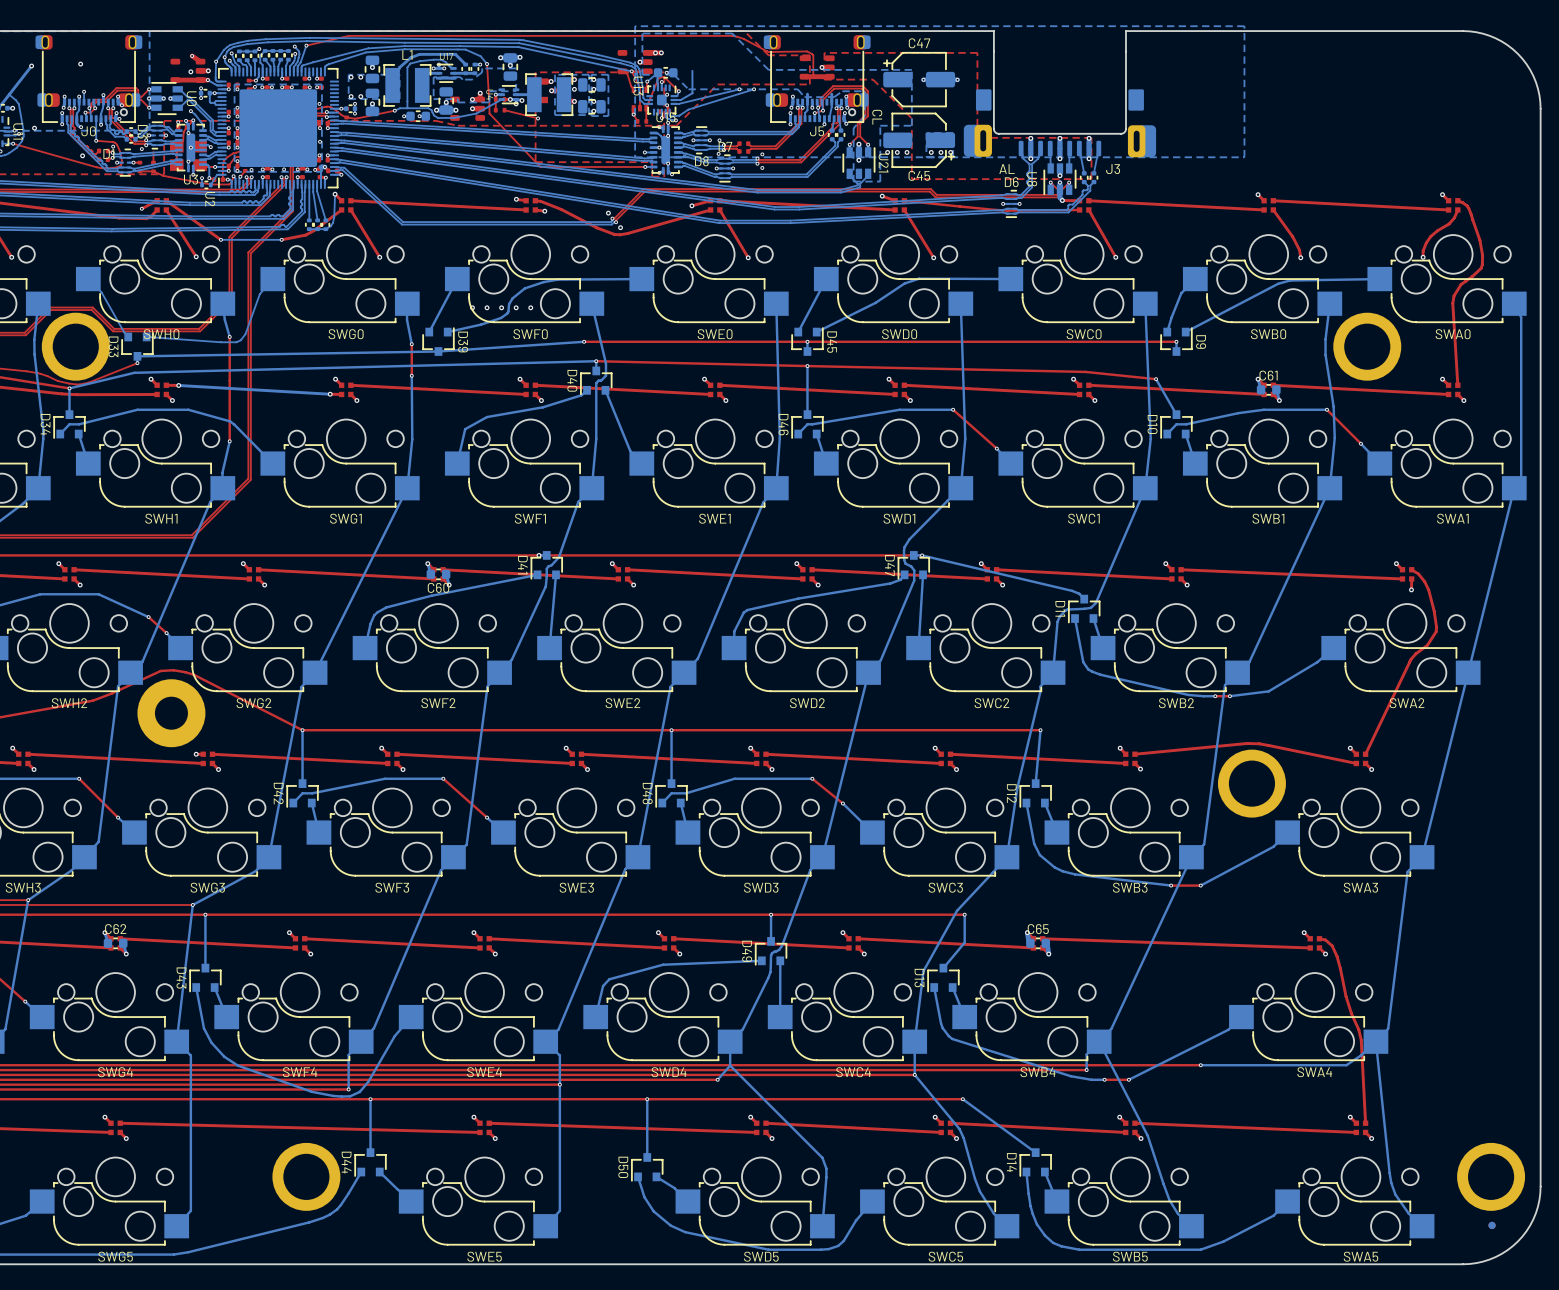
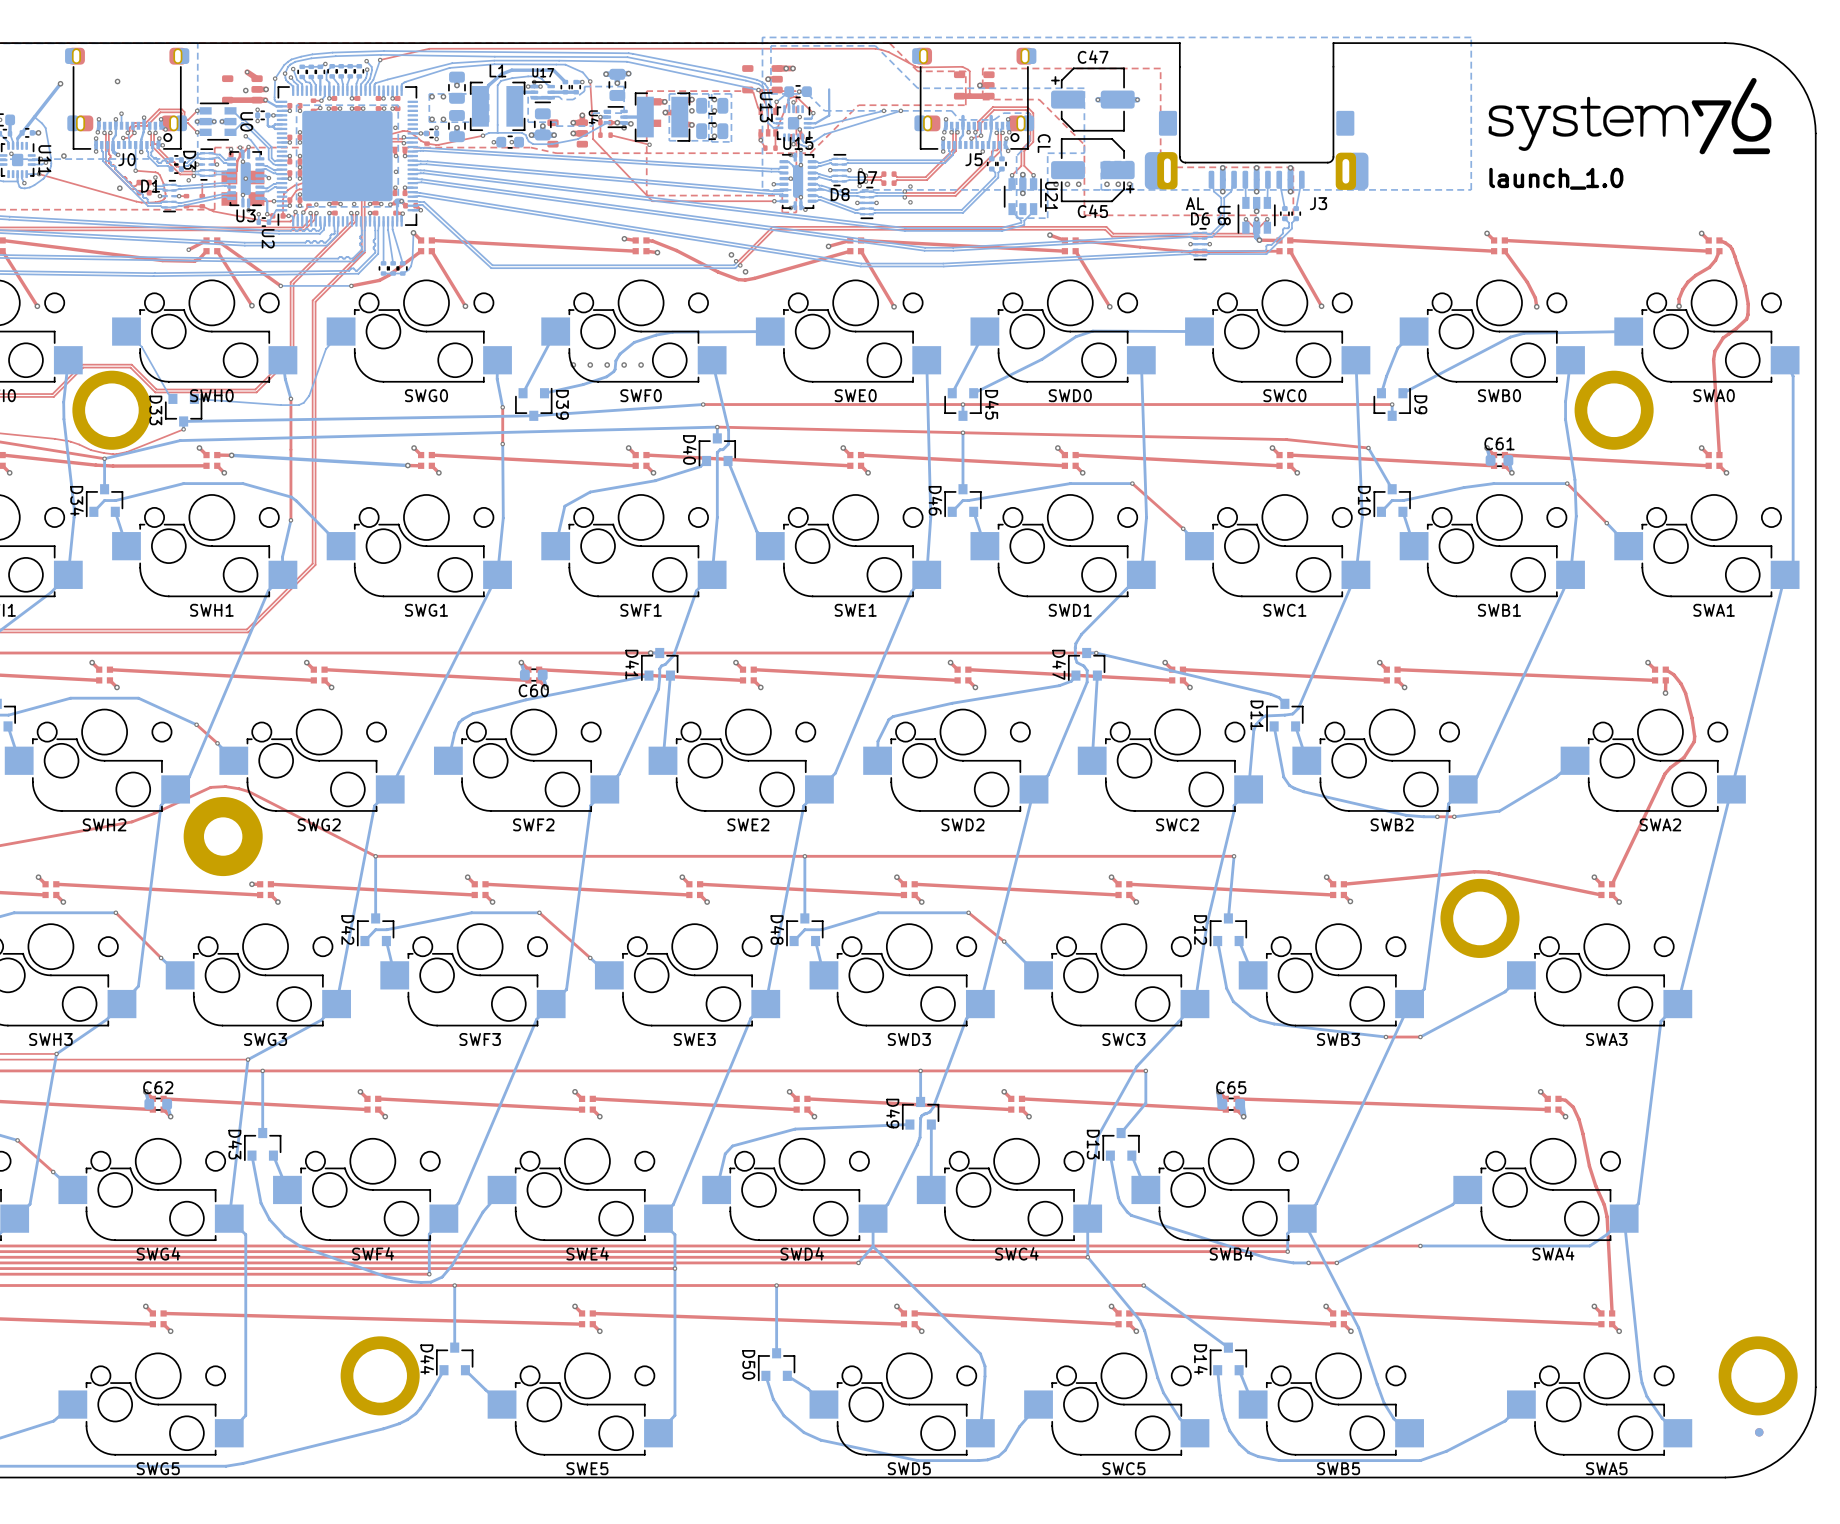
drawing: none -> [1488, 78, 1772, 155]
text: none -> launch_1.0 (1556, 178)

